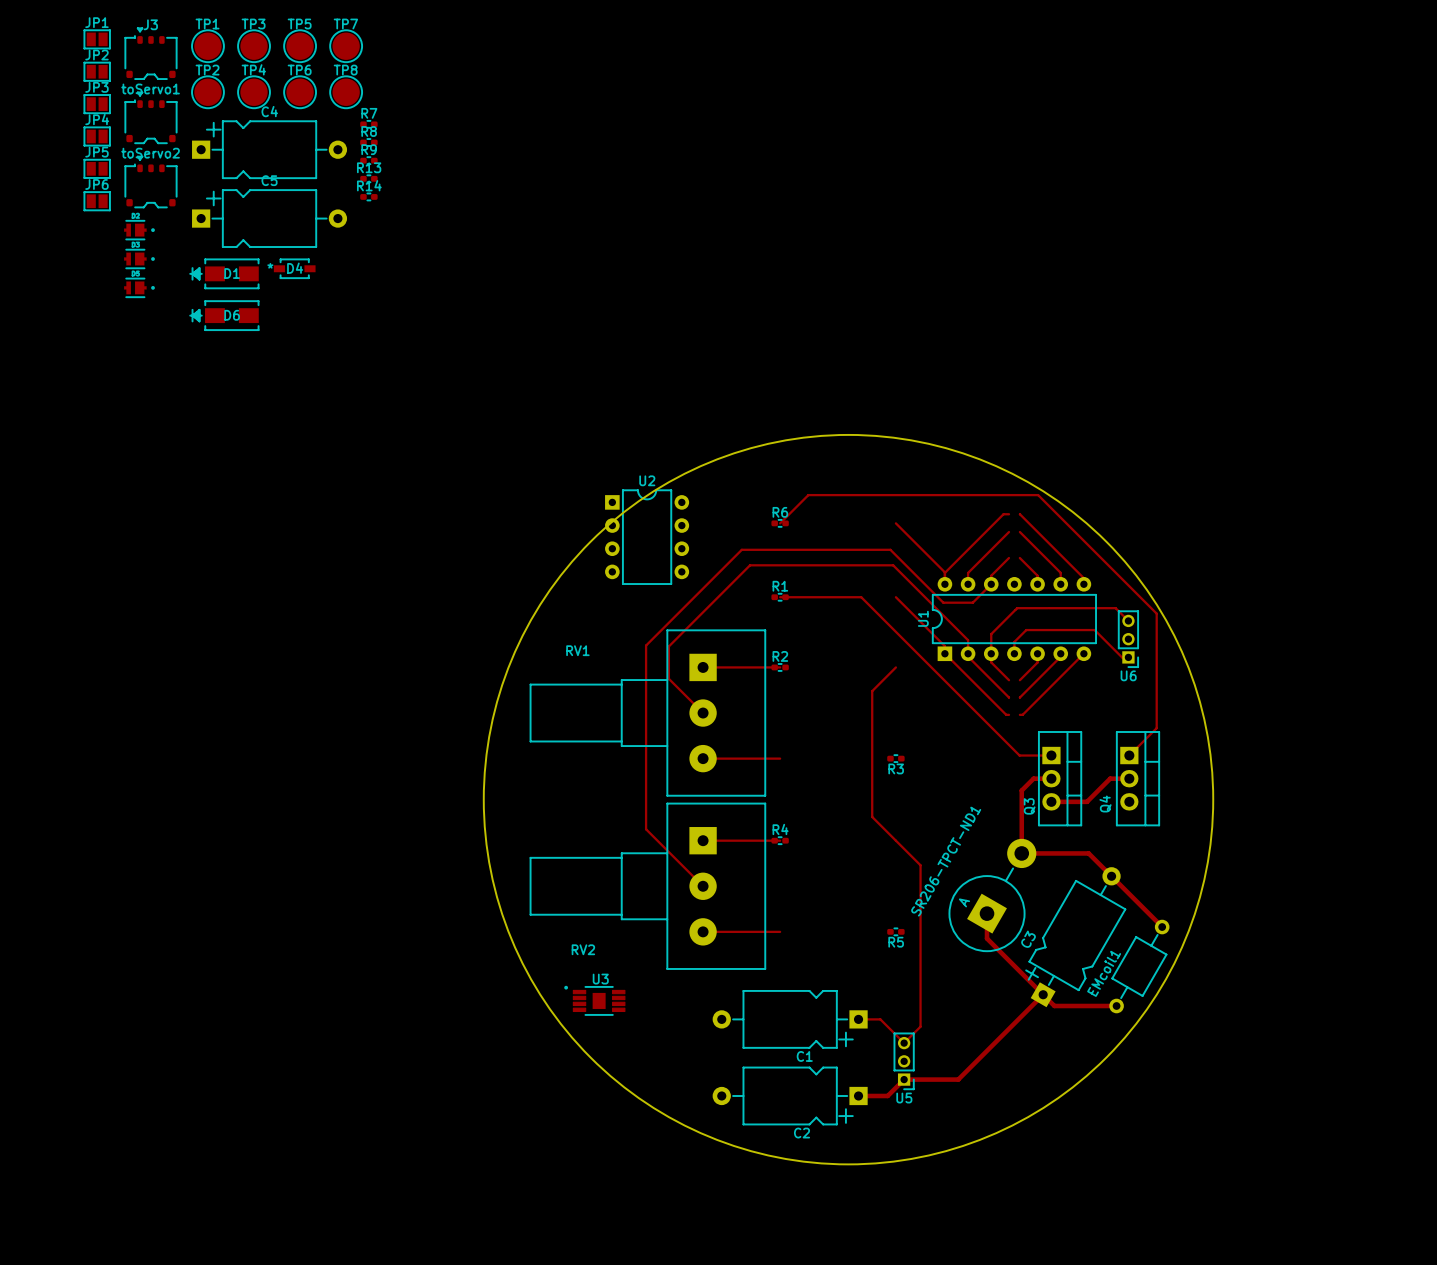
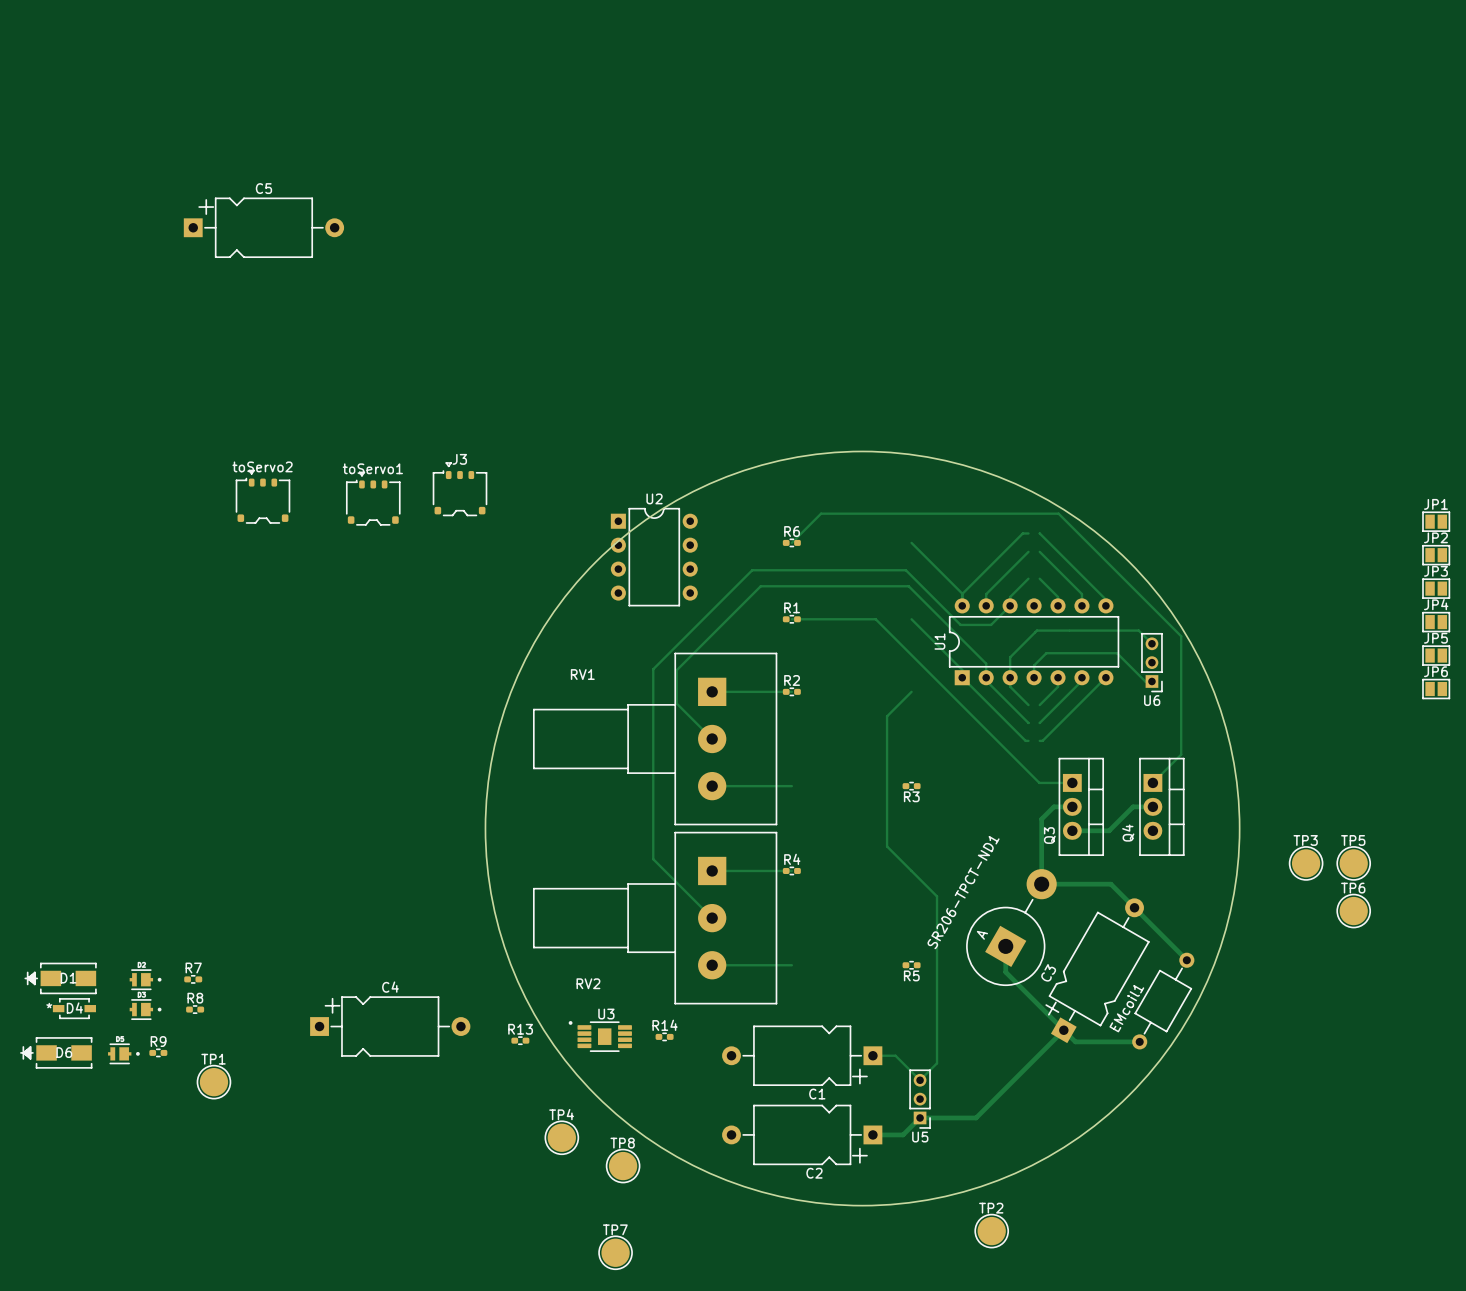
JP1 position: (97, 39) -> (1436, 521)
TP1 position: (207, 46) -> (213, 1082)
TP3 position: (254, 46) -> (1306, 863)
TP5 position: (300, 46) -> (1353, 863)
TP7 position: (346, 46) -> (615, 1252)
J3 position: (150, 53) -> (460, 489)
JP2 position: (97, 71) -> (1436, 555)
TP2 position: (207, 92) -> (991, 1231)
TP4 position: (254, 92) -> (561, 1137)
TP6 position: (300, 92) -> (1353, 911)
TP8 position: (346, 92) -> (623, 1166)
JP3 position: (97, 104) -> (1436, 588)
toServo1 position: (150, 117) -> (373, 498)
R7 position: (368, 124) -> (193, 979)
JP4 position: (97, 136) -> (1436, 622)
R8 position: (368, 142) -> (195, 1009)
C4 position: (269, 149) -> (390, 1026)
R9 position: (368, 160) -> (158, 1052)
JP5 position: (97, 168) -> (1436, 655)
R13 position: (368, 178) -> (520, 1040)
toServo2 position: (150, 182) -> (262, 496)
R14 position: (368, 196) -> (664, 1036)
JP6 position: (97, 201) -> (1436, 689)
part position: (139, 230) -> (145, 979)
part position: (139, 259) -> (145, 1009)
D4 position: (294, 268) -> (74, 1008)
D1 position: (224, 273) -> (60, 978)
part position: (139, 287) -> (123, 1053)
D6 position: (224, 315) -> (56, 1052)

